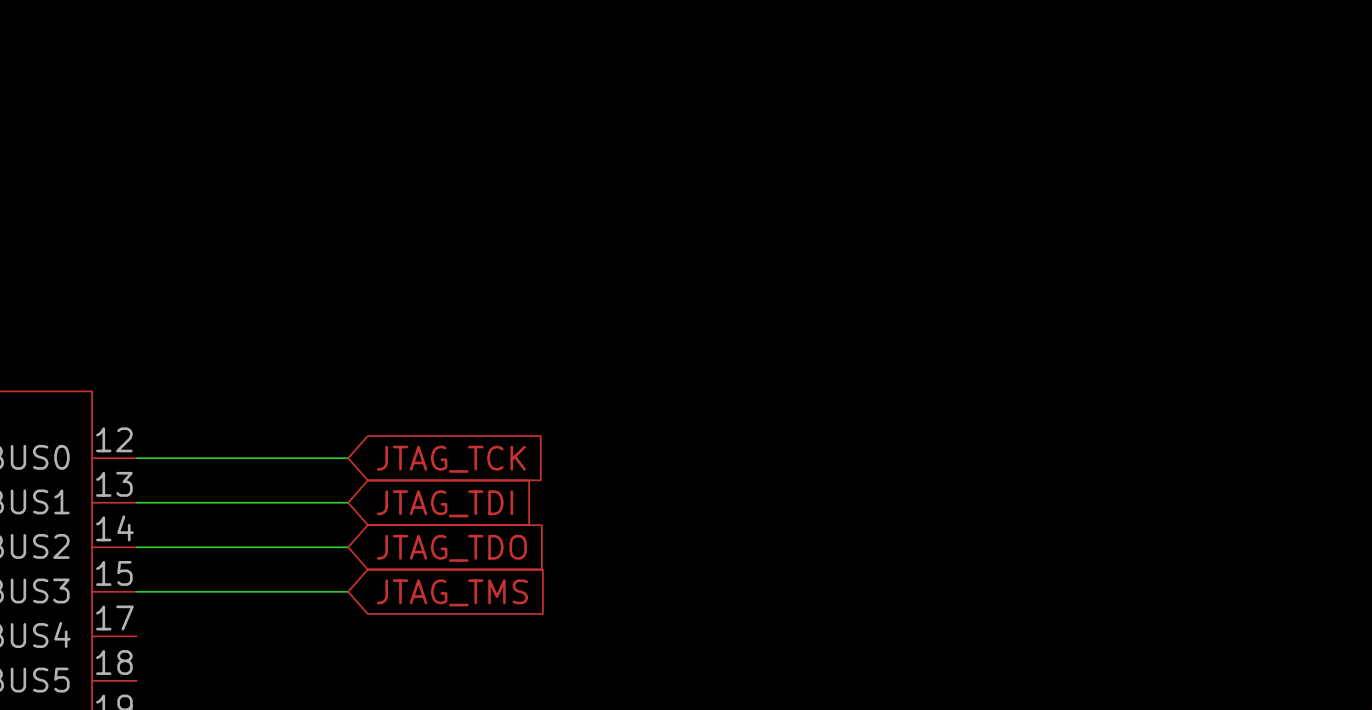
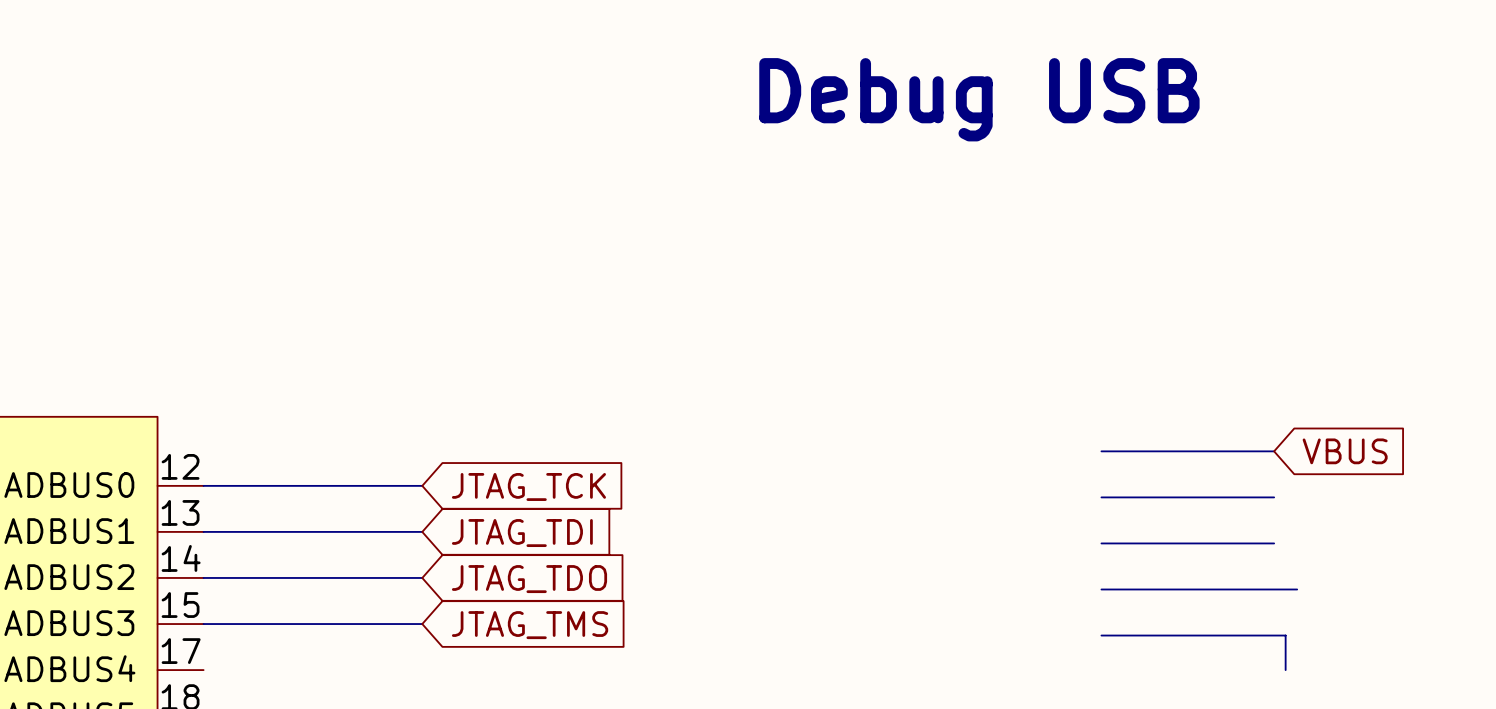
text: none -> Debug USB (979, 99)
wire: none -> (1101, 451) (1274, 451)
global label: none -> VBUS (1345, 451)
wire: none -> (1101, 497) (1274, 497)
wire: none -> (1101, 543) (1274, 543)
wire: none -> (1101, 589) (1297, 589)
wire: none -> (1101, 635) (1285, 635) (1285, 670)

